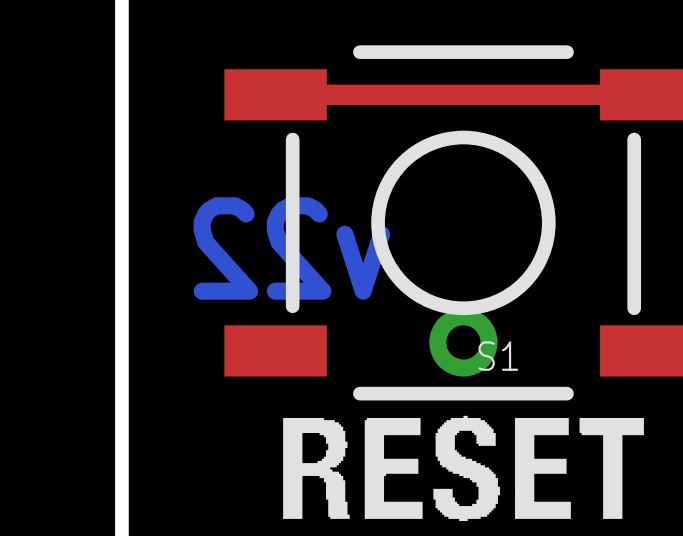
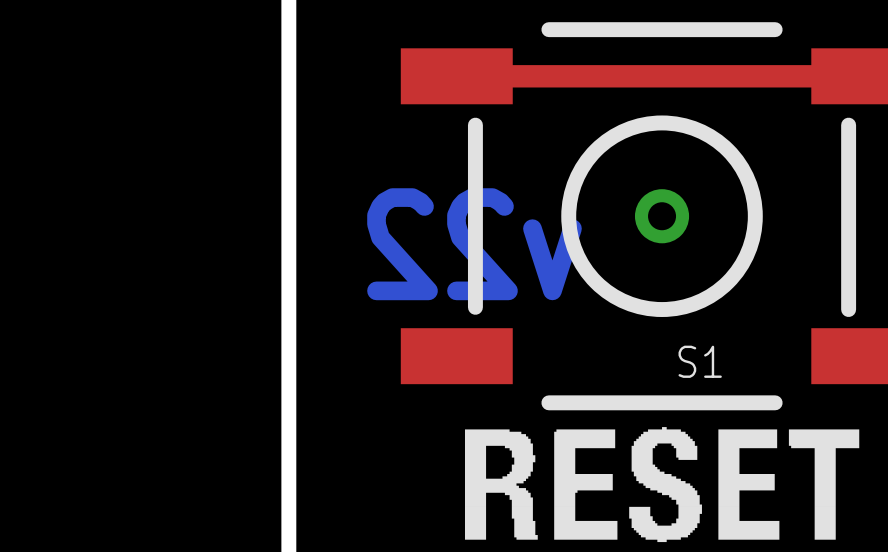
via: none -> (662, 216)
via: (463, 342) -> none

